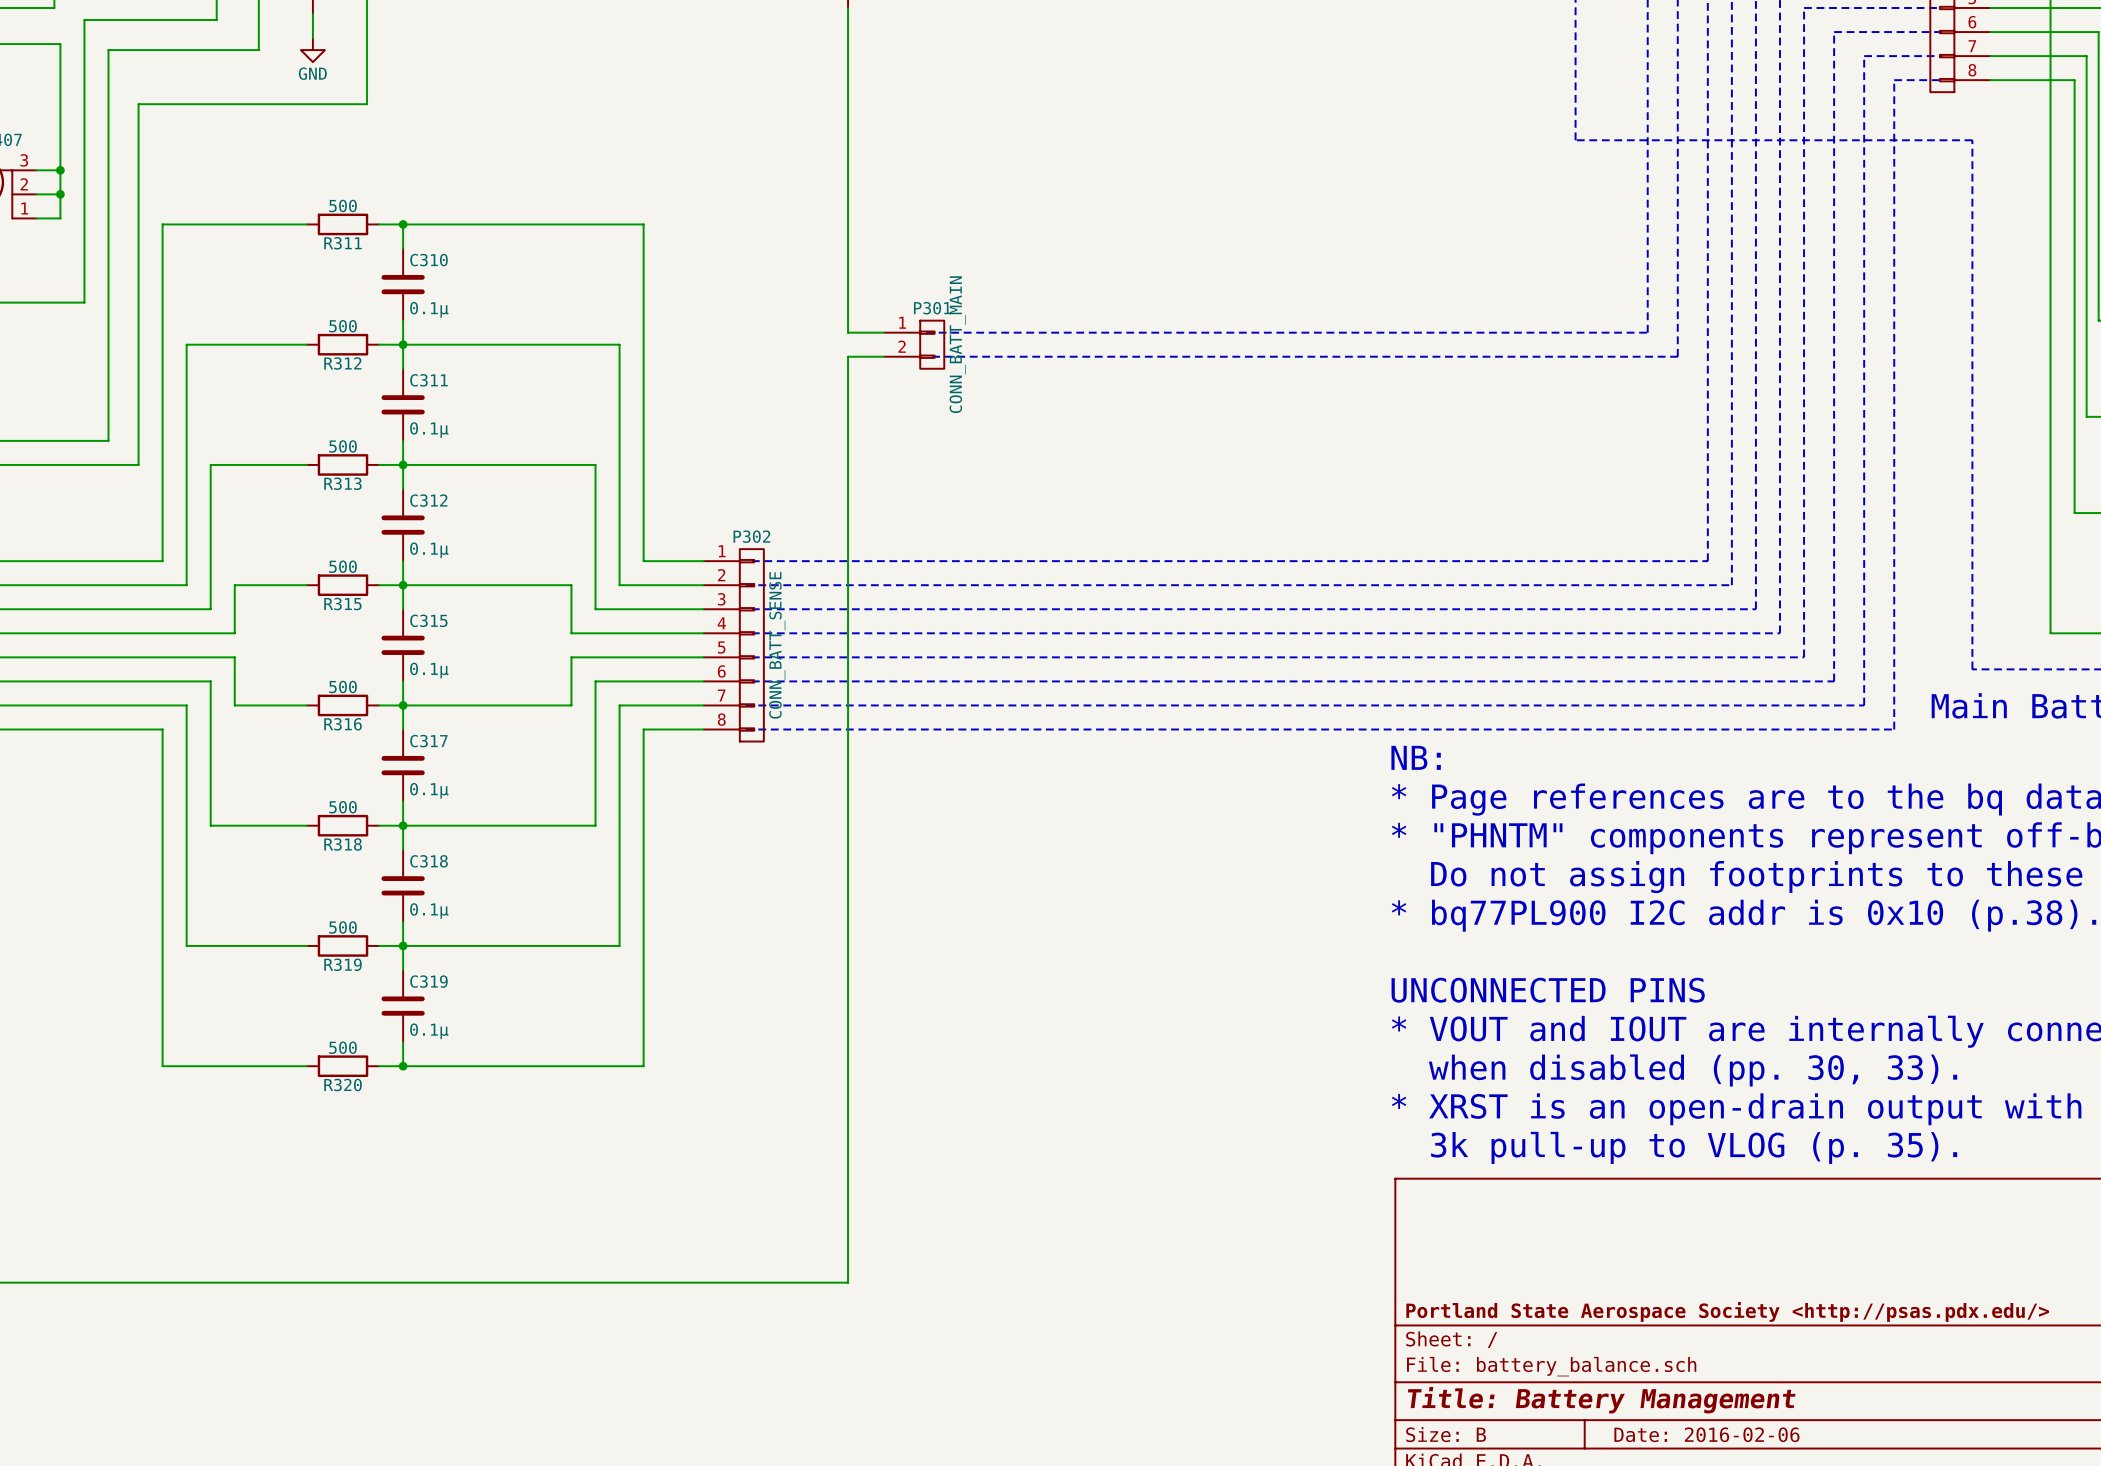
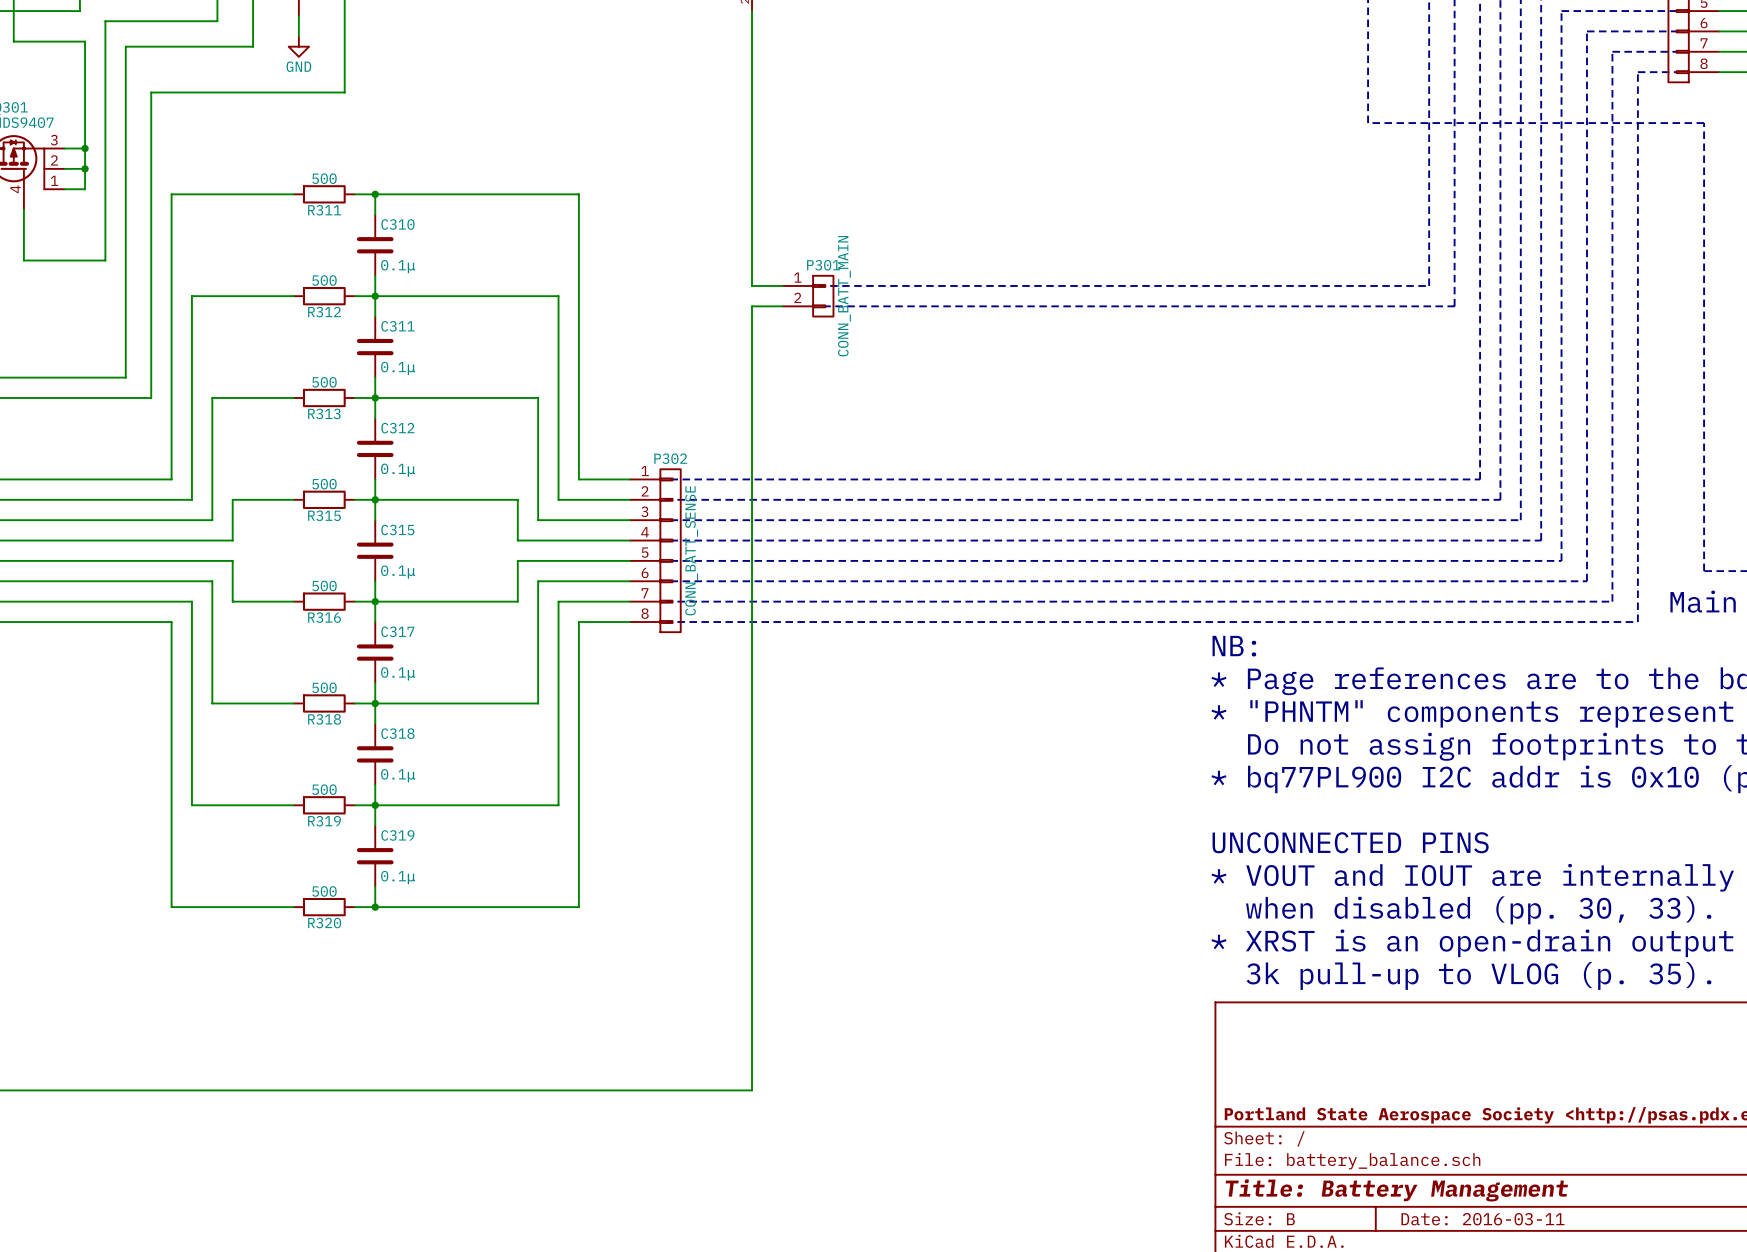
title block: Date: 2016-02-06 (1706, 1434) -> Date: 2016-03-11 (1482, 1219)

